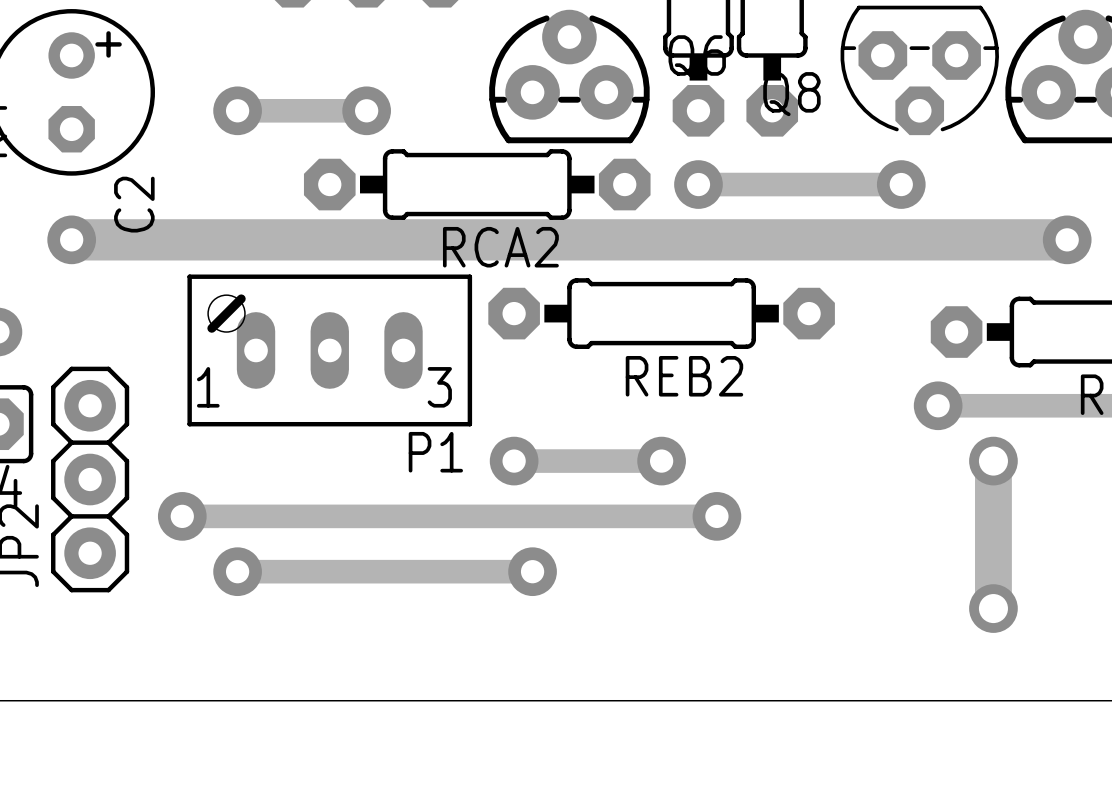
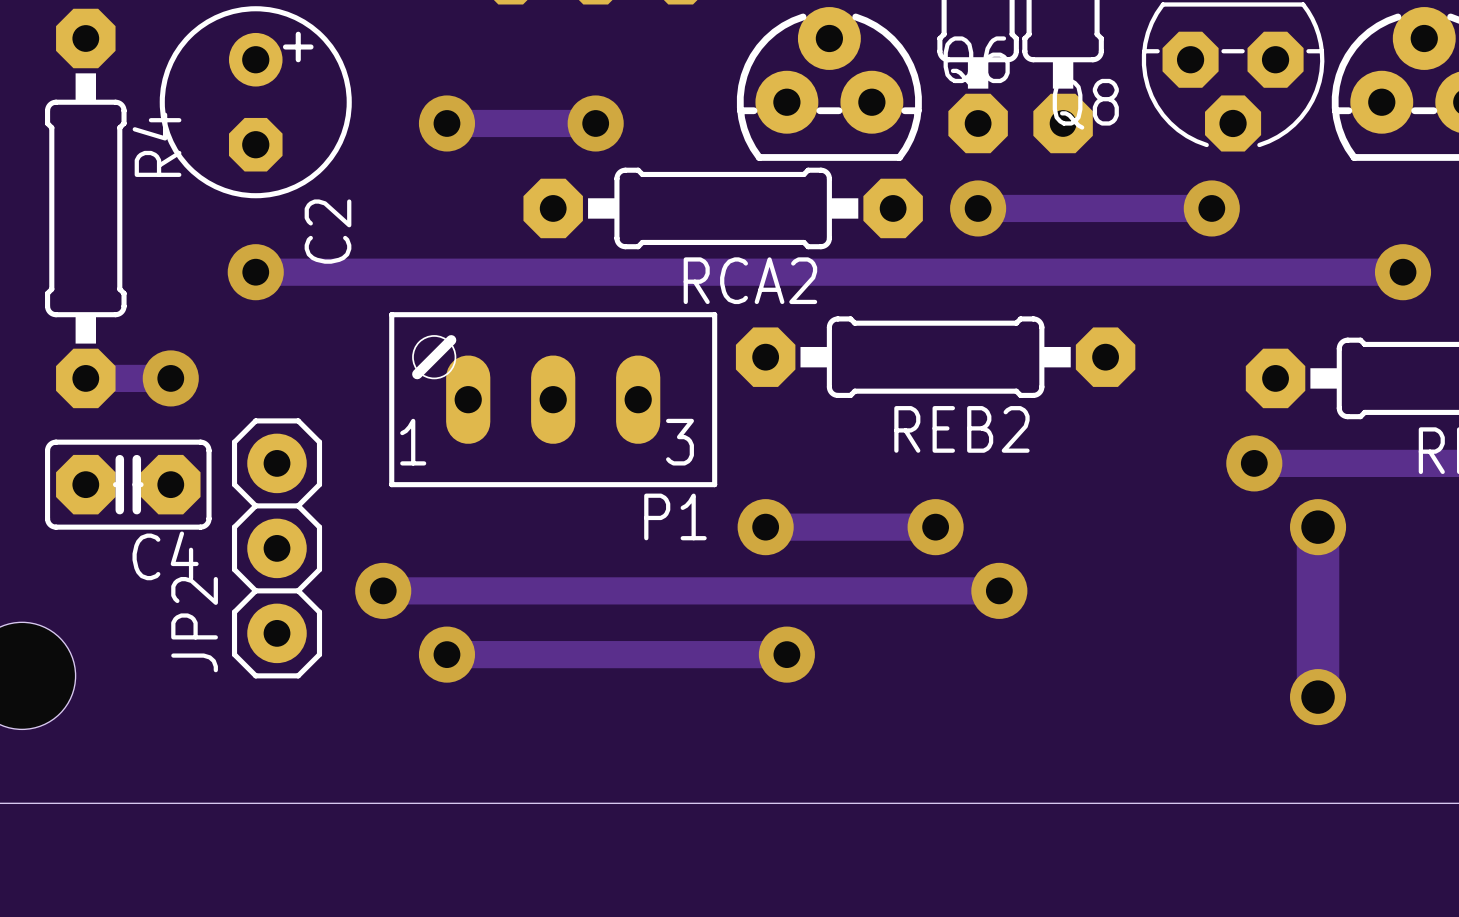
track width: thick (71, 239) (1067, 239) -> thin (255, 272) (1403, 272)

